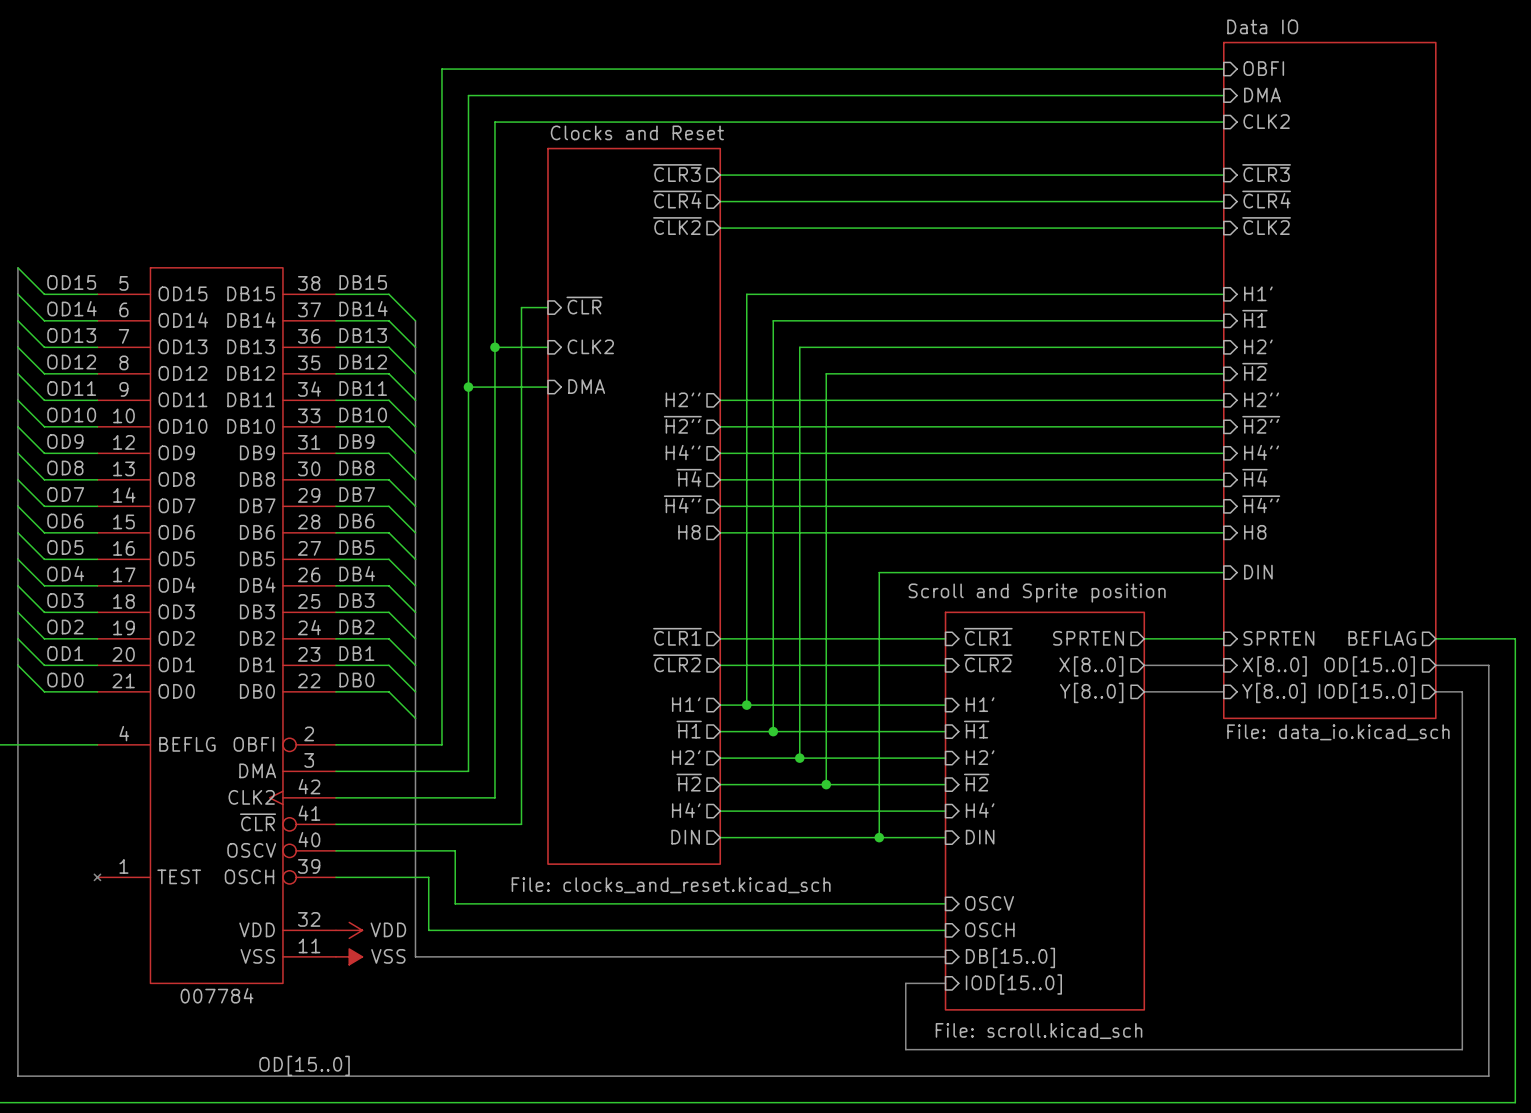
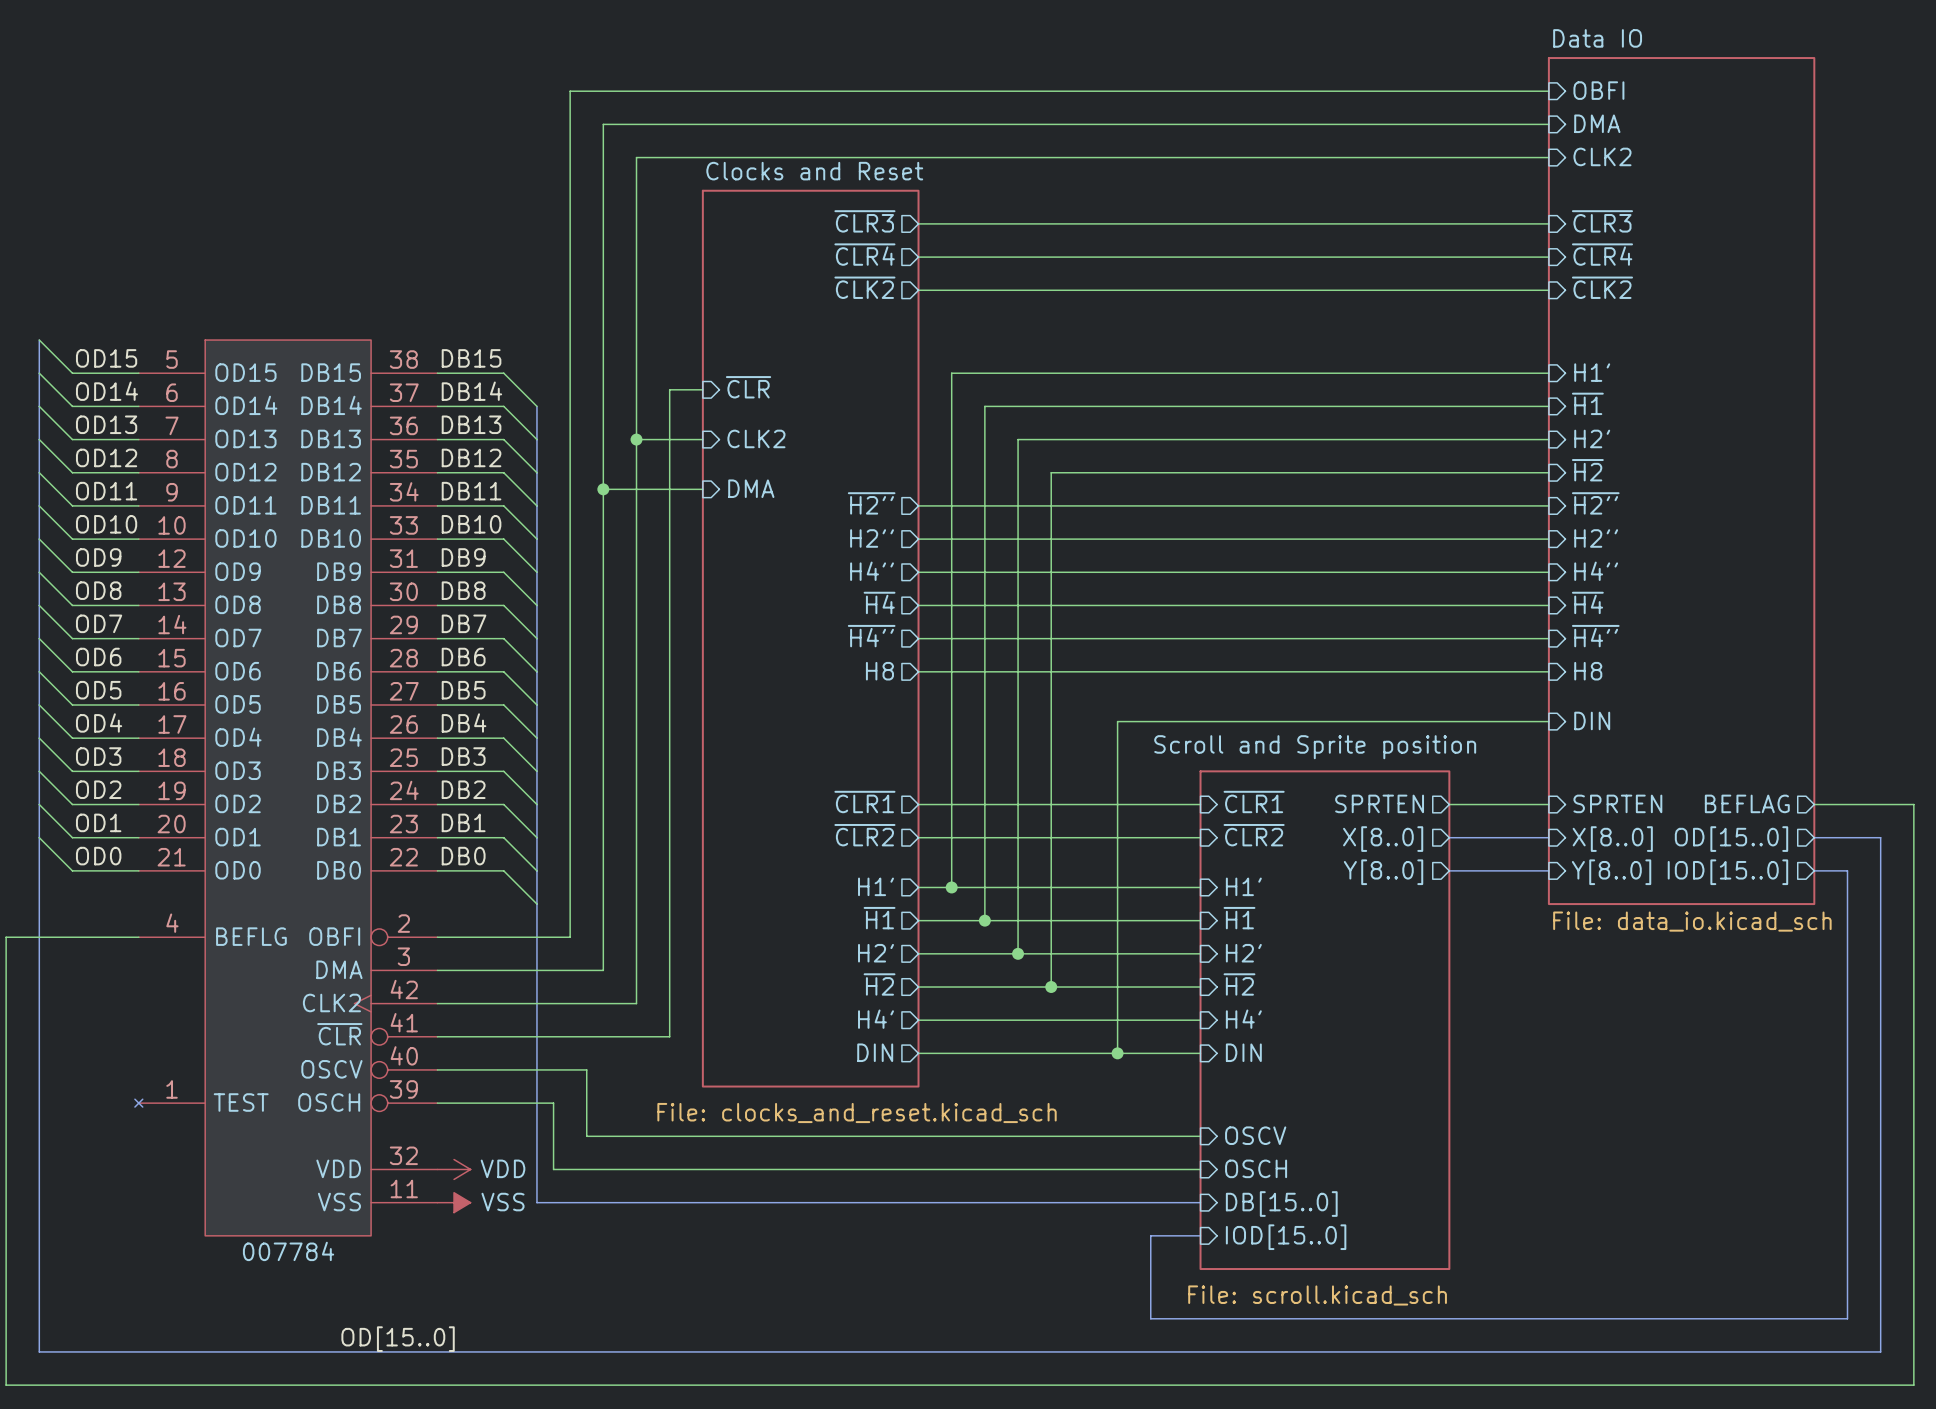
sheet pin: H2'' (683, 399) -> ~{H2''} (871, 503)
sheet pin: H2'' (1261, 399) -> ~{H2''} (1595, 503)
sheet pin: ~{H2''} (682, 424) -> H2'' (872, 538)
sheet pin: ~{H2''} (1261, 424) -> H2'' (1596, 538)

